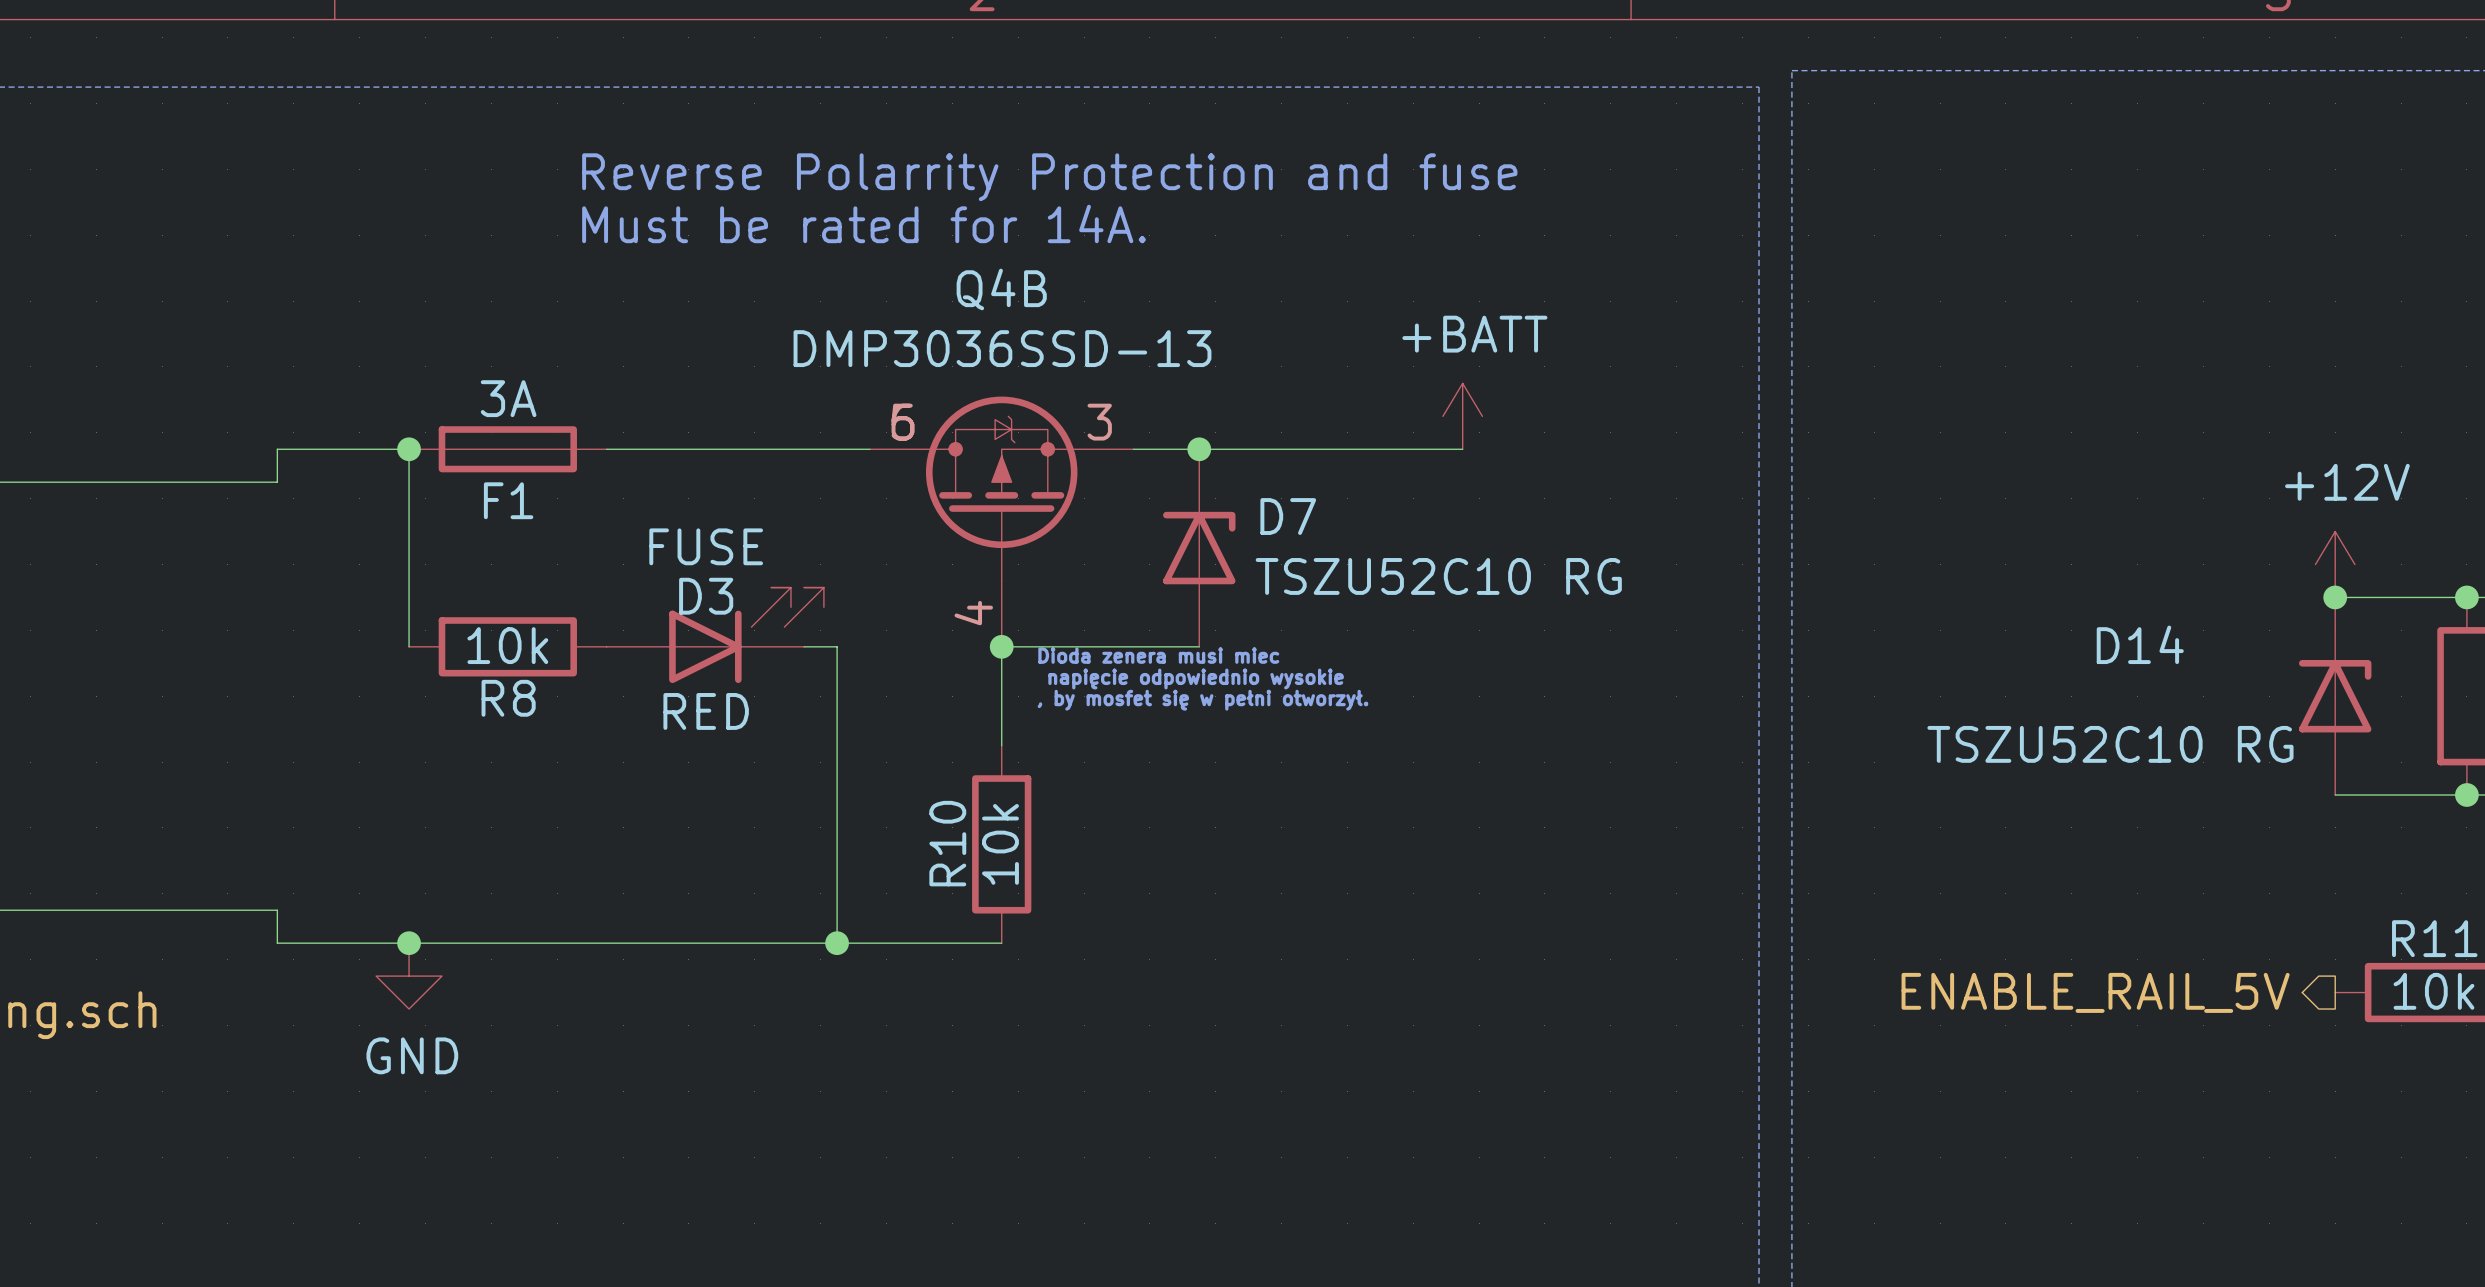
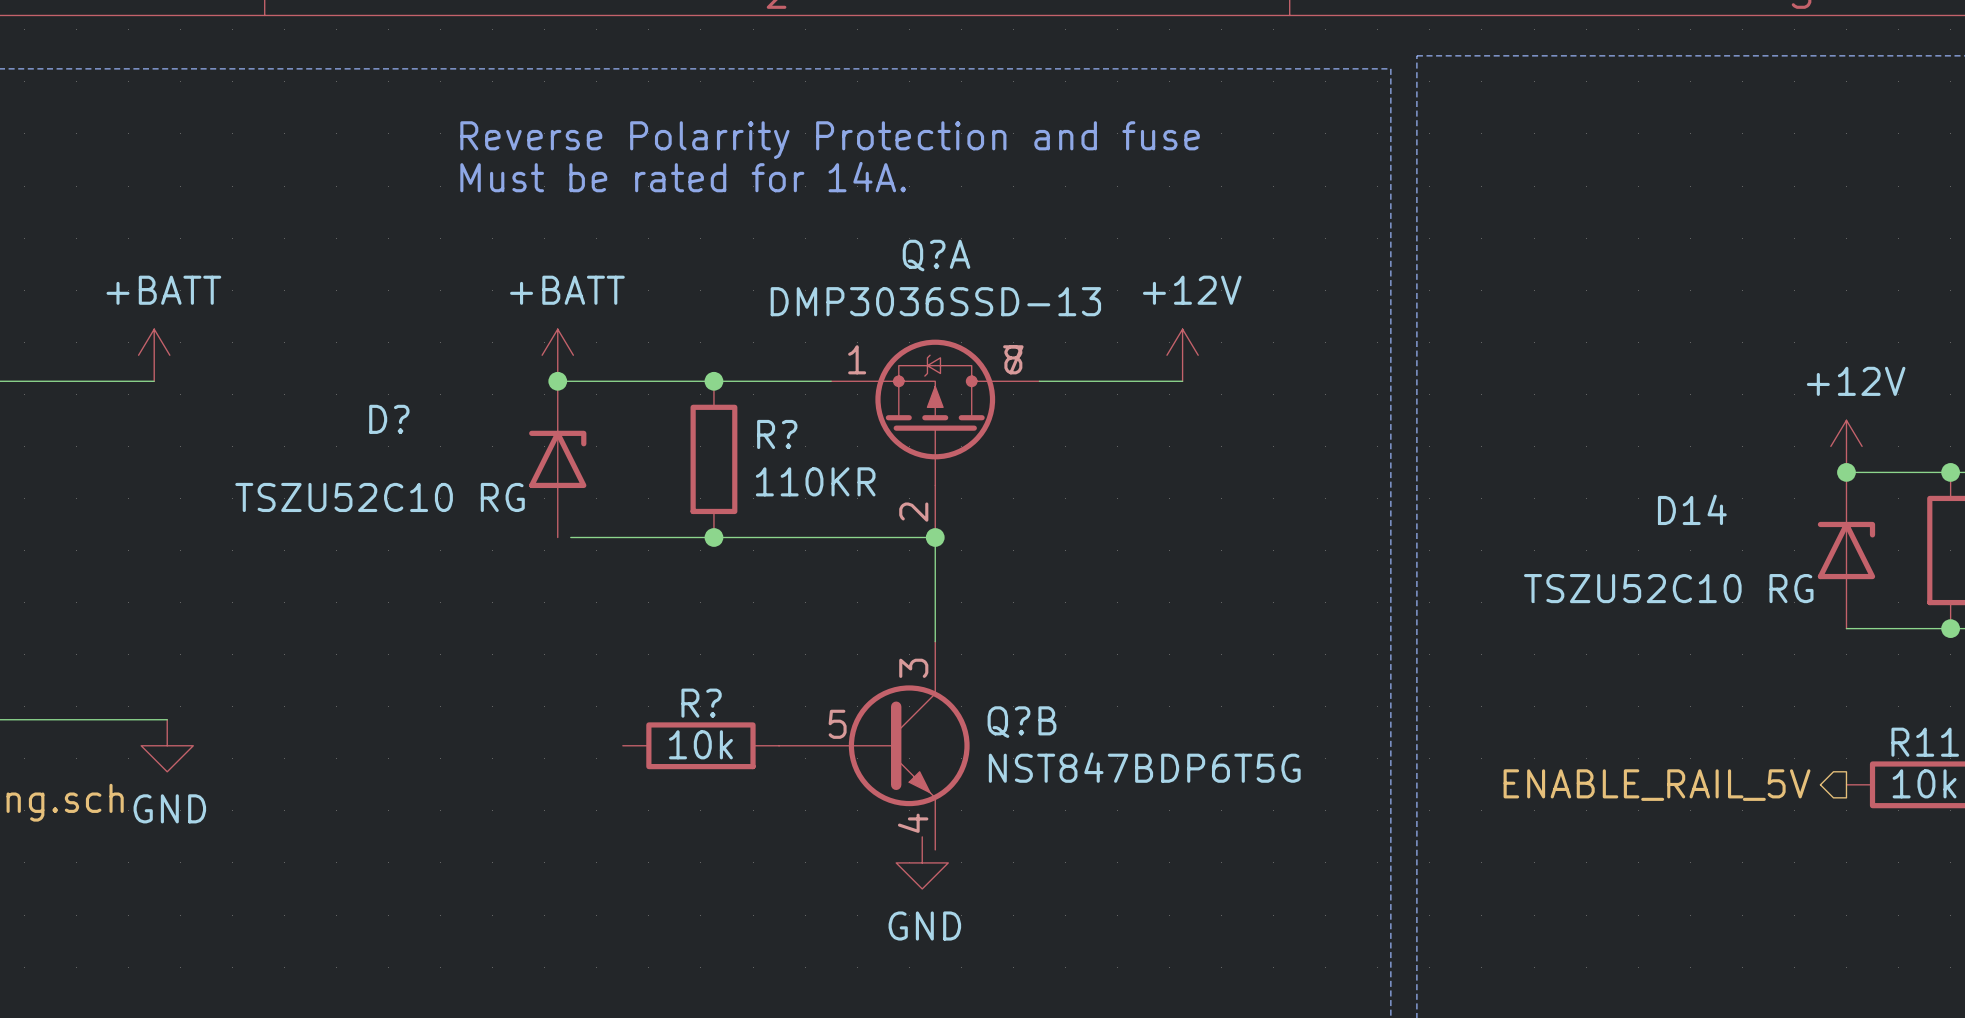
power symbol: +BATT (1462, 416) -> none
power symbol: none -> +BATT (154, 355)
junction: (409, 449) -> none
F1: 3A (507, 449) -> none
wire: (606, 449) (870, 449) -> none
power symbol: none -> +BATT (557, 355)
wire: (1133, 449) (1462, 449) -> none
junction: (1199, 449) -> none
power symbol: none -> +12V (1182, 355)
wire: (195, 482) (277, 482) (277, 449) (409, 449) (409, 646) -> none
wire: none -> (557, 381) (831, 381)
junction: none -> (557, 381)
junction: none -> (713, 381)
wire: none -> (1039, 381) (1182, 381)
Q4B: DMP3036SSD-13 (1001, 521) -> none
D7: TSZU52C10 RG (1199, 548) -> none
Q?A: none -> DMP3036SSD-13 (935, 438)
D?: none -> TSZU52C10 RG (557, 459)
R?: none -> 110KR (713, 459)
D3: RED (715, 635) -> none
R8: 10k (507, 646) -> none
wire: (804, 646) (837, 646) (837, 943) -> none
junction: (1001, 646) -> none
wire: (1199, 646) (1001, 646) (1001, 745) -> none
text: Dioda zenera musi miec (1158, 655) -> none
wire: none -> (570, 537) (935, 537) (935, 641)
junction: none -> (713, 537)
junction: none -> (935, 537)
text: napięcie odpowiednio wysokie (1196, 679) -> none
text: , by mosfet się w pełni otworzył. (1203, 700) -> none
R10: 10k (1001, 844) -> none
wire: (211, 910) (277, 910) (277, 943) (1001, 943) -> none
junction: (409, 943) -> none
junction: (837, 943) -> none
R?: none -> 10k (700, 745)
Q?B: none -> NST847BDP6T5G (874, 745)
power symbol position: GND (409, 976) -> GND (167, 745)
power symbol: none -> GND (922, 862)

